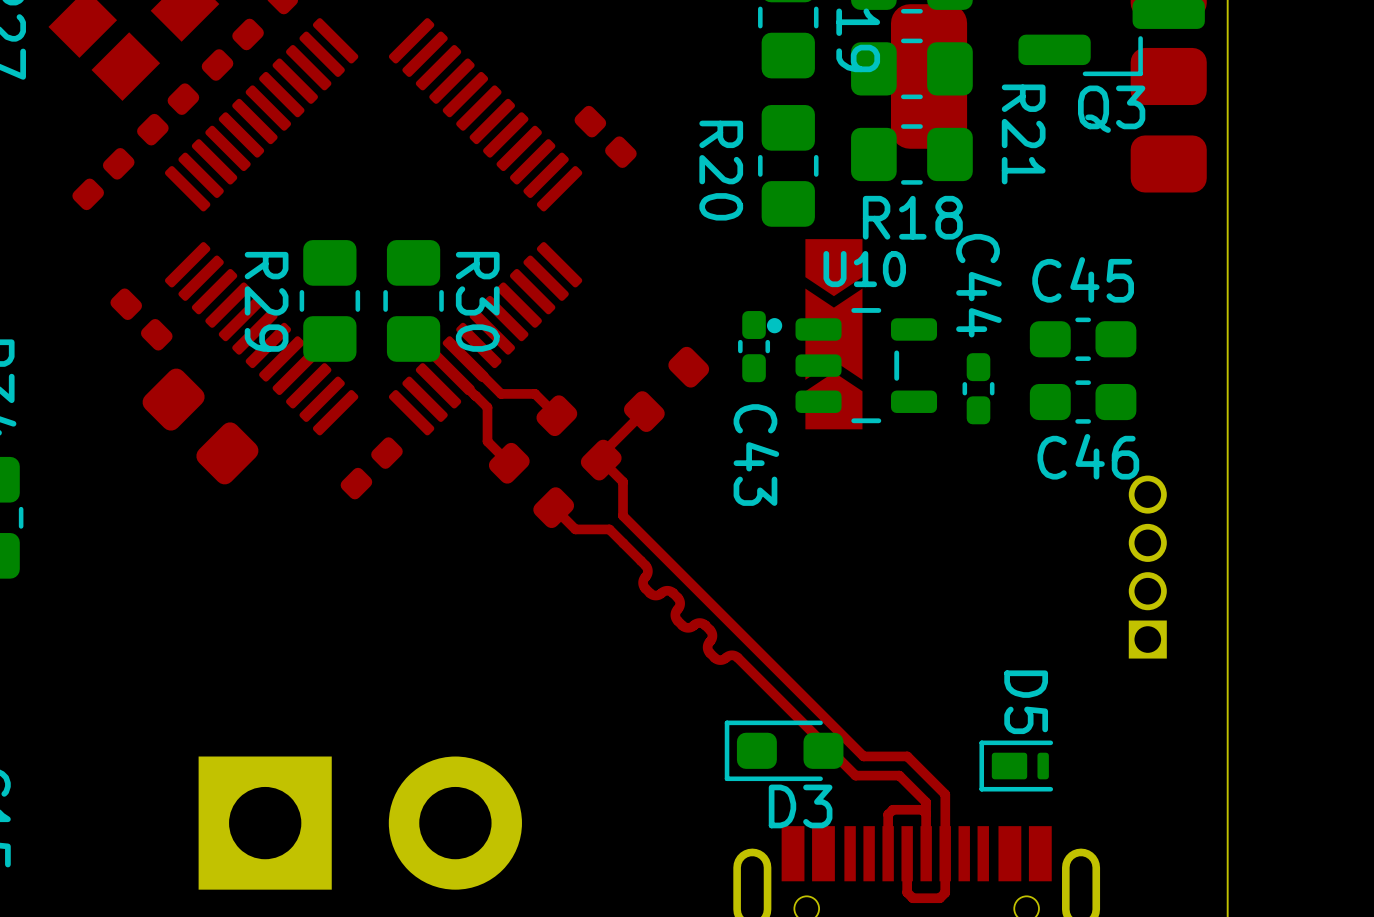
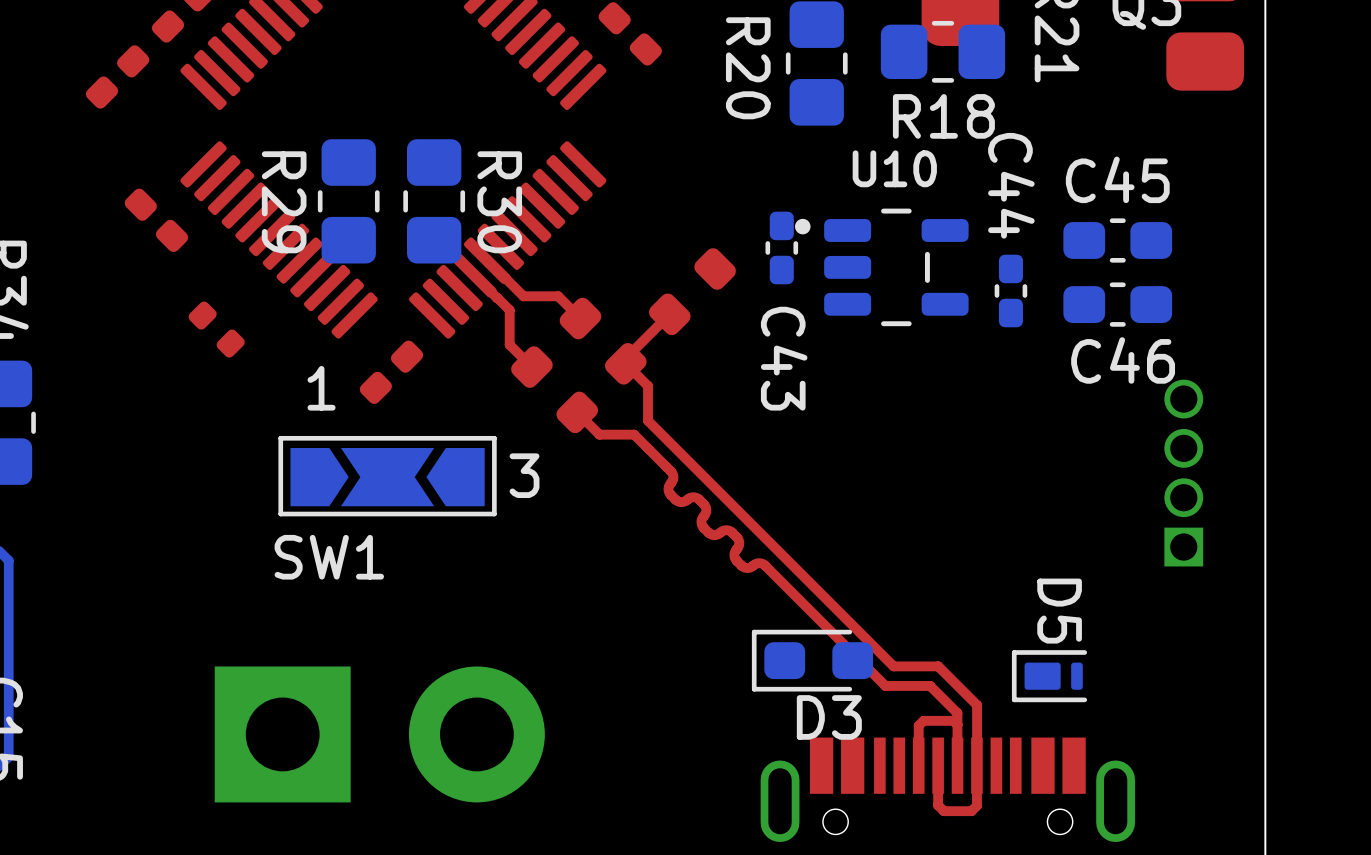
SW1 side: top (833, 334) -> bottom (387, 476)
part footprint: [142, 368, 259, 485] -> [188, 301, 245, 358]

